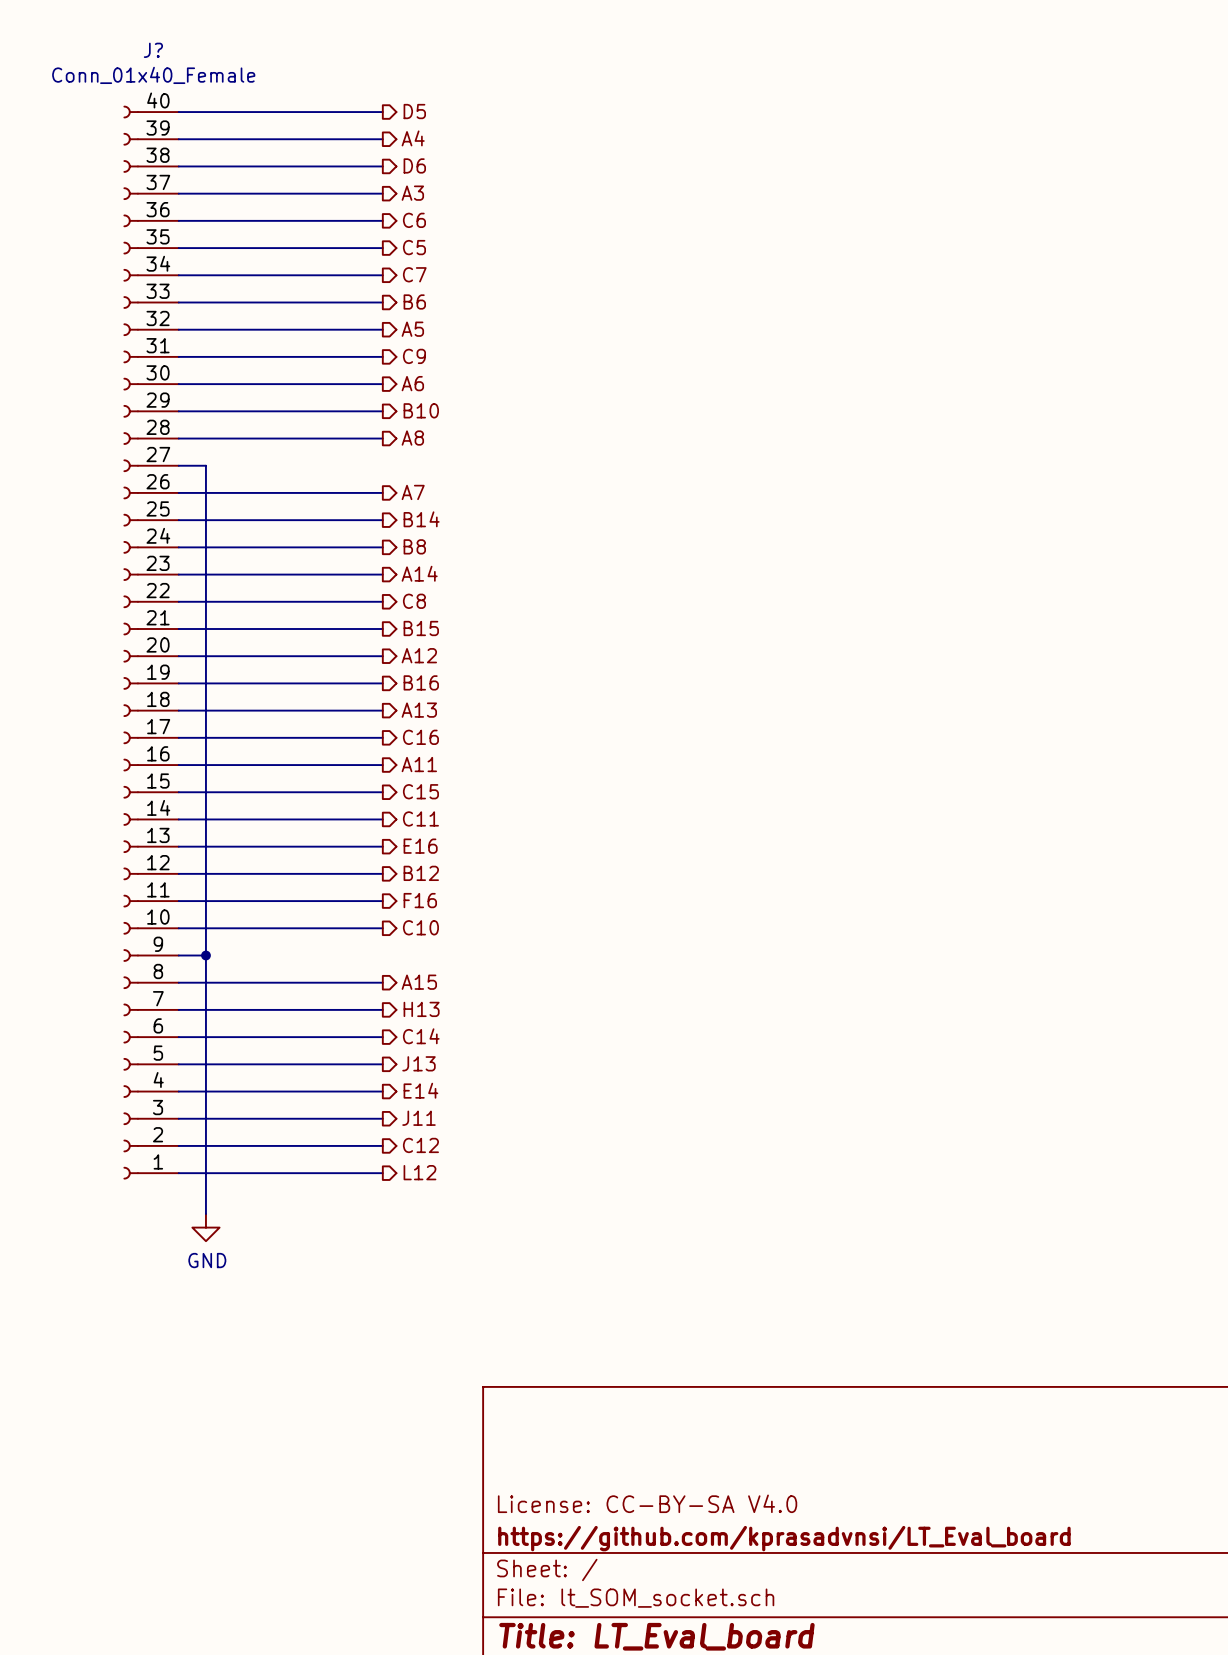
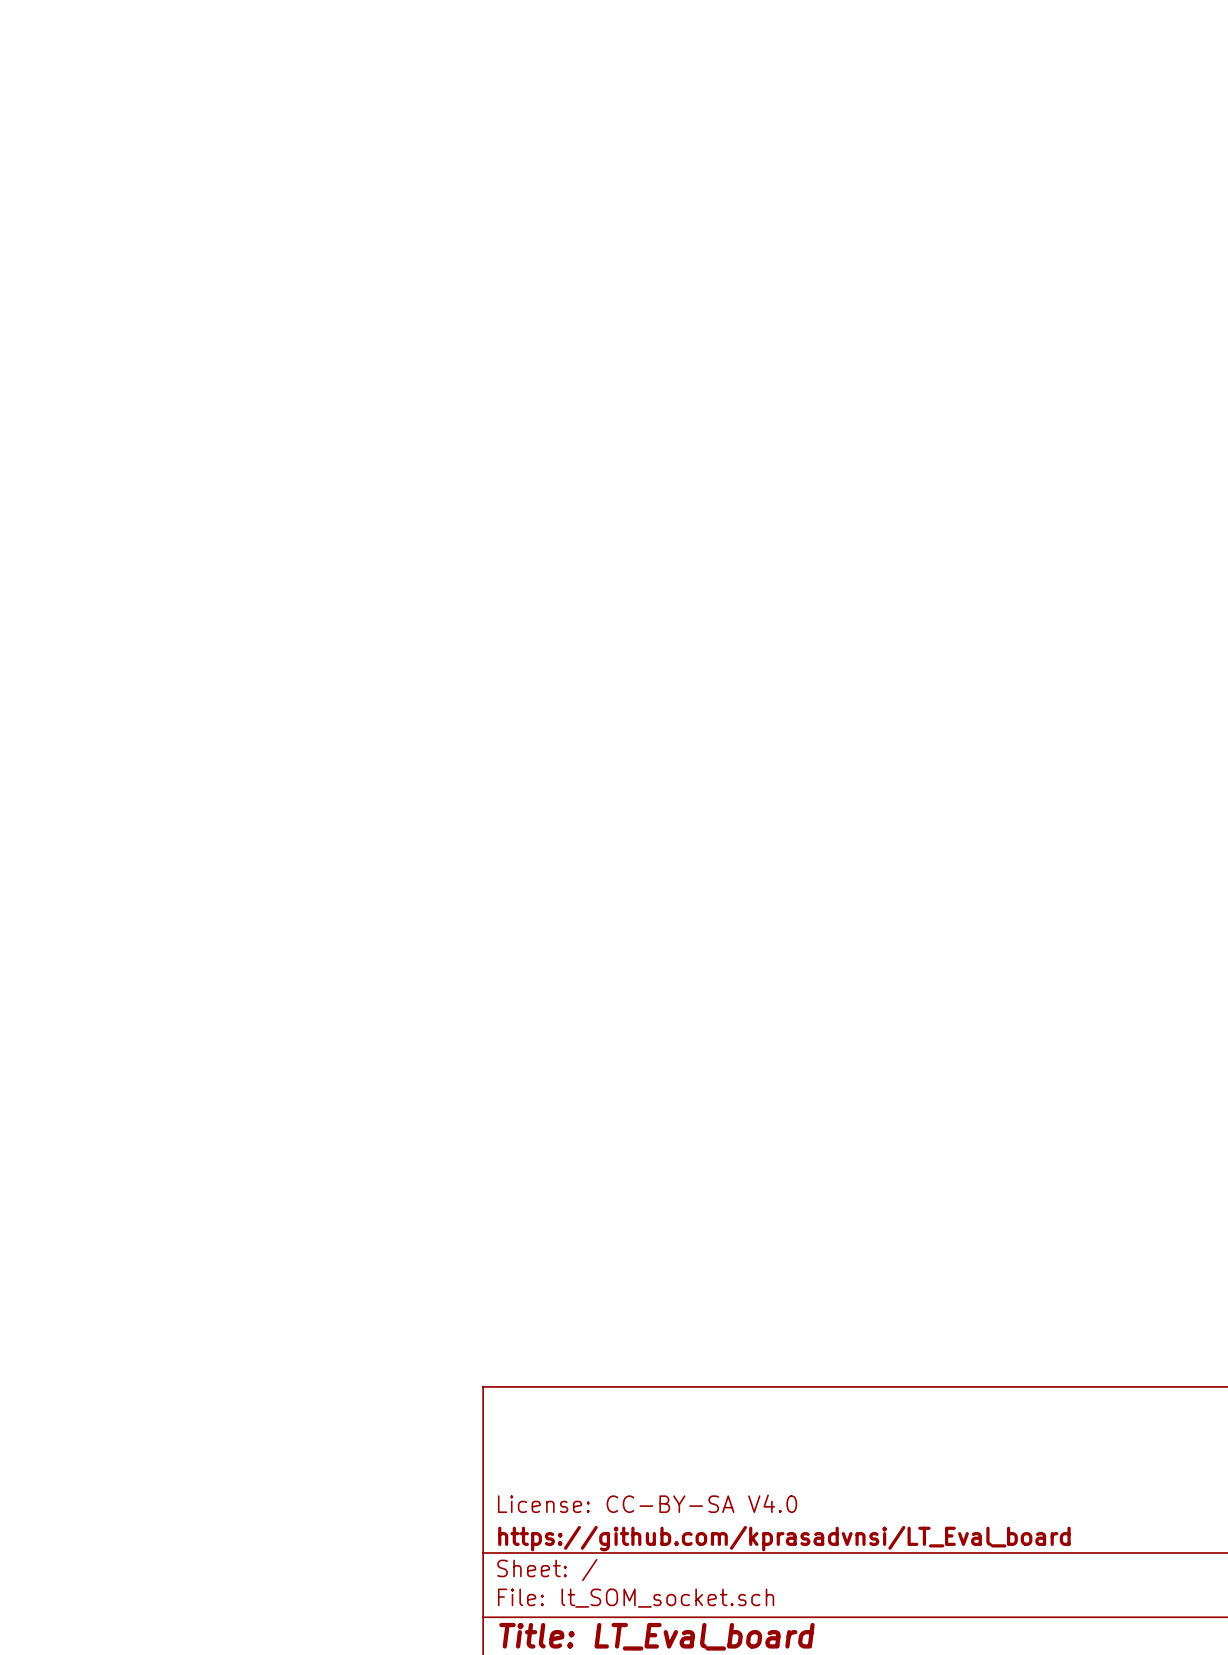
hierarchical label: D5 (414, 111) -> none
wire: (178, 112) (382, 112) -> none
hierarchical label: A4 (413, 138) -> none
wire: (178, 139) (382, 139) -> none
hierarchical label: D6 (414, 165) -> none
wire: (178, 166) (382, 166) -> none
wire: (178, 193) (382, 193) -> none
hierarchical label: A3 (412, 193) -> none
wire: (178, 220) (382, 220) -> none
hierarchical label: C6 (414, 220) -> none
hierarchical label: C5 (414, 247) -> none
wire: (178, 248) (382, 248) -> none
hierarchical label: C7 (414, 274) -> none
wire: (178, 275) (382, 275) -> none
hierarchical label: B6 (414, 301) -> none
wire: (178, 302) (382, 302) -> none
wire: (178, 329) (382, 329) -> none
hierarchical label: A5 (412, 329) -> none
wire: (178, 356) (382, 356) -> none
hierarchical label: C9 (414, 356) -> none
hierarchical label: A6 (412, 383) -> none
wire: (178, 384) (382, 384) -> none
hierarchical label: B10 (421, 410) -> none
wire: (178, 411) (382, 411) -> none
wire: (178, 438) (382, 438) -> none
hierarchical label: A8 (412, 438) -> none
wire: (178, 465) (205, 465) (205, 1213) -> none
wire: (178, 492) (382, 492) -> none
hierarchical label: A7 (413, 492) -> none
hierarchical label: B14 (421, 519) -> none
wire: (178, 520) (382, 520) -> none
hierarchical label: B8 (414, 546) -> none
wire: (178, 547) (382, 547) -> none
hierarchical label: A14 (419, 573) -> none
wire: (178, 574) (382, 574) -> none
wire: (178, 601) (382, 601) -> none
hierarchical label: C8 (414, 601) -> none
hierarchical label: B15 (421, 628) -> none
wire: (178, 629) (382, 629) -> none
J?: Conn_01x40_Female (151, 642) -> none
hierarchical label: A12 (419, 655) -> none
wire: (178, 656) (382, 656) -> none
hierarchical label: B16 (421, 682) -> none
wire: (178, 683) (382, 683) -> none
wire: (178, 710) (382, 710) -> none
hierarchical label: A13 (419, 710) -> none
wire: (178, 737) (382, 737) -> none
hierarchical label: C16 (420, 737) -> none
hierarchical label: A11 (419, 764) -> none
wire: (178, 765) (382, 765) -> none
hierarchical label: C15 (420, 791) -> none
wire: (178, 792) (382, 792) -> none
hierarchical label: C11 (420, 818) -> none
wire: (178, 819) (382, 819) -> none
wire: (178, 846) (382, 846) -> none
hierarchical label: E16 (420, 846) -> none
wire: (178, 873) (382, 873) -> none
hierarchical label: B12 (421, 873) -> none
hierarchical label: F16 (420, 900) -> none
wire: (178, 901) (382, 901) -> none
hierarchical label: C10 (420, 927) -> none
wire: (178, 928) (382, 928) -> none
wire: (178, 955) (205, 955) -> none
junction: (205, 955) -> none
wire: (178, 982) (382, 982) -> none
hierarchical label: A15 (419, 982) -> none
wire: (178, 1009) (382, 1009) -> none
hierarchical label: H13 (421, 1009) -> none
hierarchical label: C14 (421, 1036) -> none
wire: (178, 1037) (382, 1037) -> none
hierarchical label: J13 (418, 1063) -> none
wire: (178, 1064) (382, 1064) -> none
hierarchical label: E14 (420, 1090) -> none
wire: (178, 1091) (382, 1091) -> none
wire: (178, 1118) (382, 1118) -> none
hierarchical label: J11 (418, 1118) -> none
wire: (178, 1145) (382, 1145) -> none
hierarchical label: C12 (420, 1145) -> none
hierarchical label: L12 (419, 1172) -> none
wire: (178, 1173) (382, 1173) -> none
power symbol: GND (205, 1227) -> none

